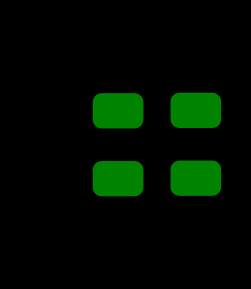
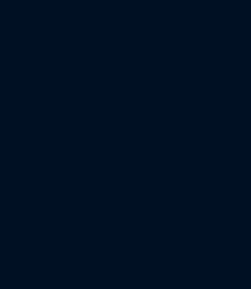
part: (118, 144) -> none
part: (195, 144) -> none

